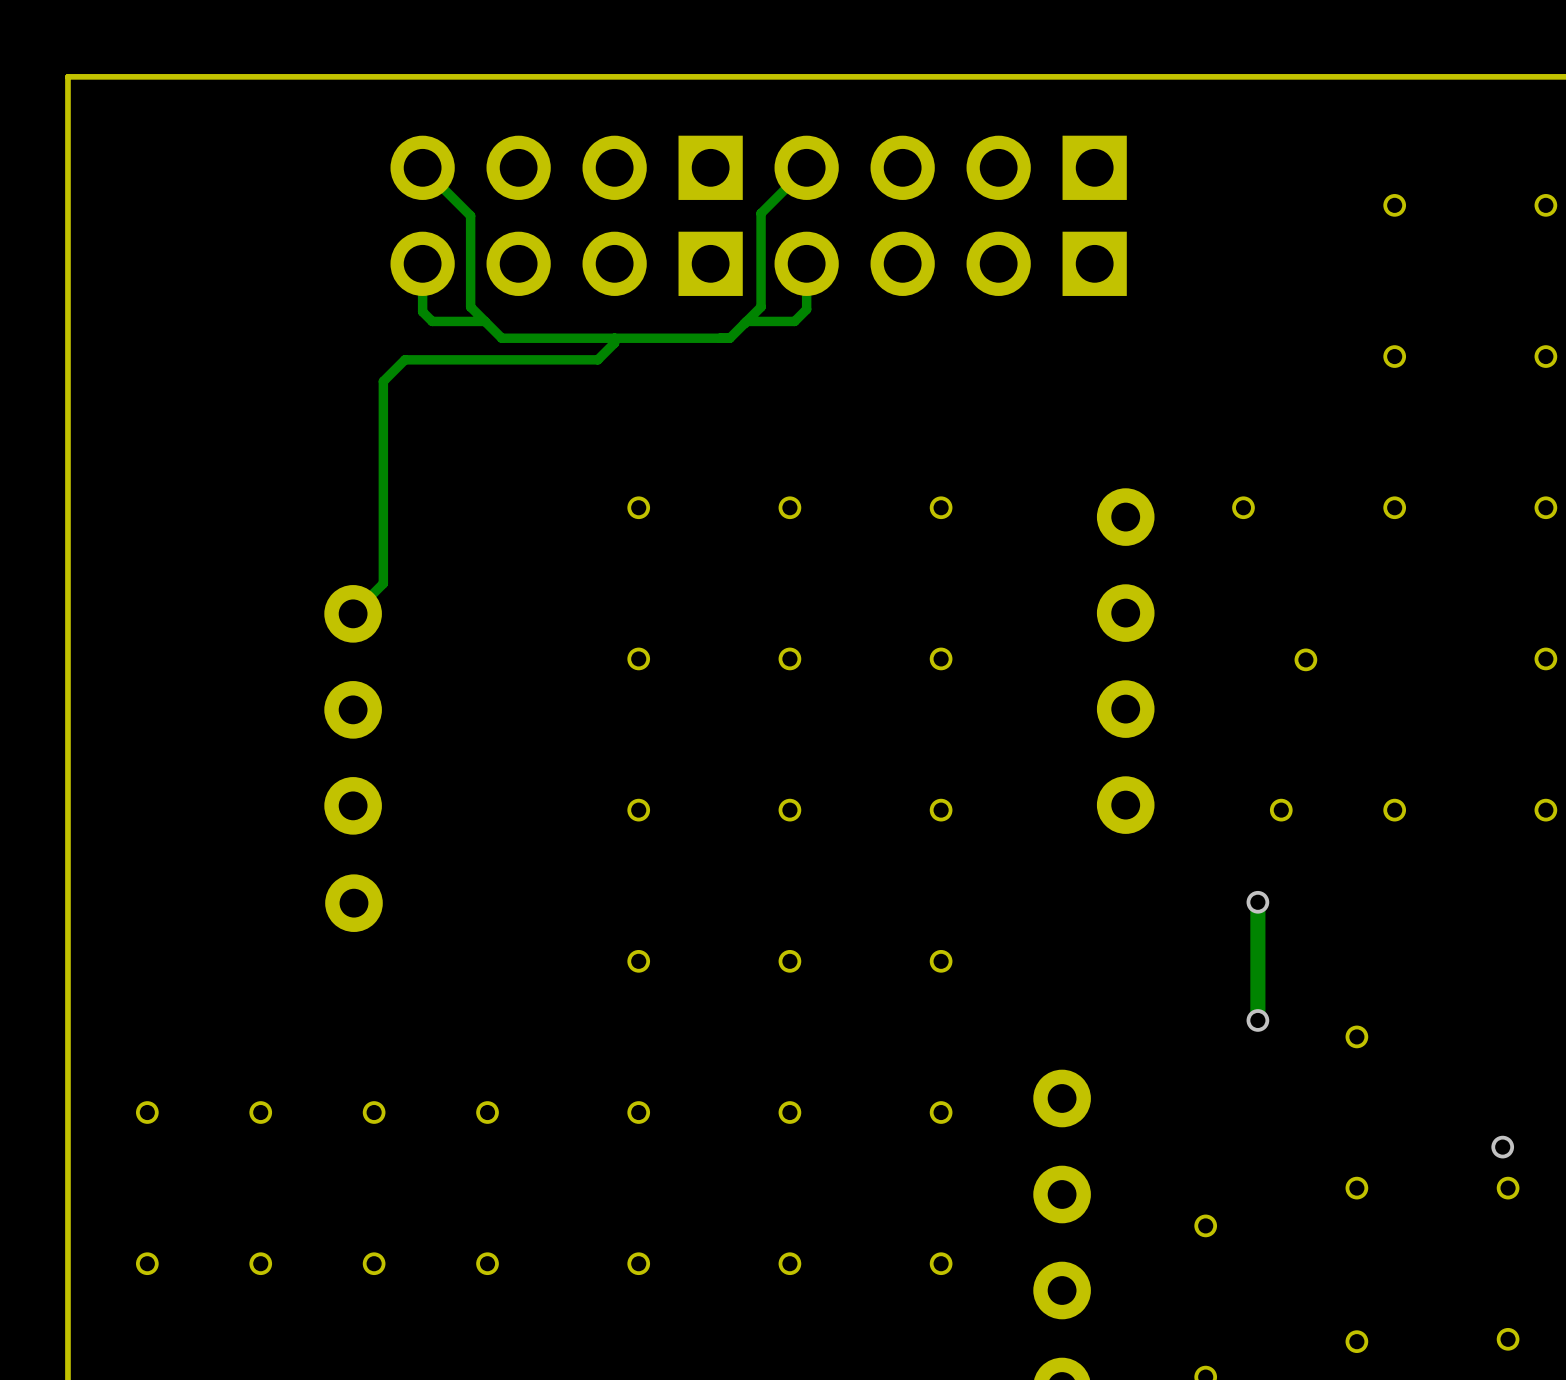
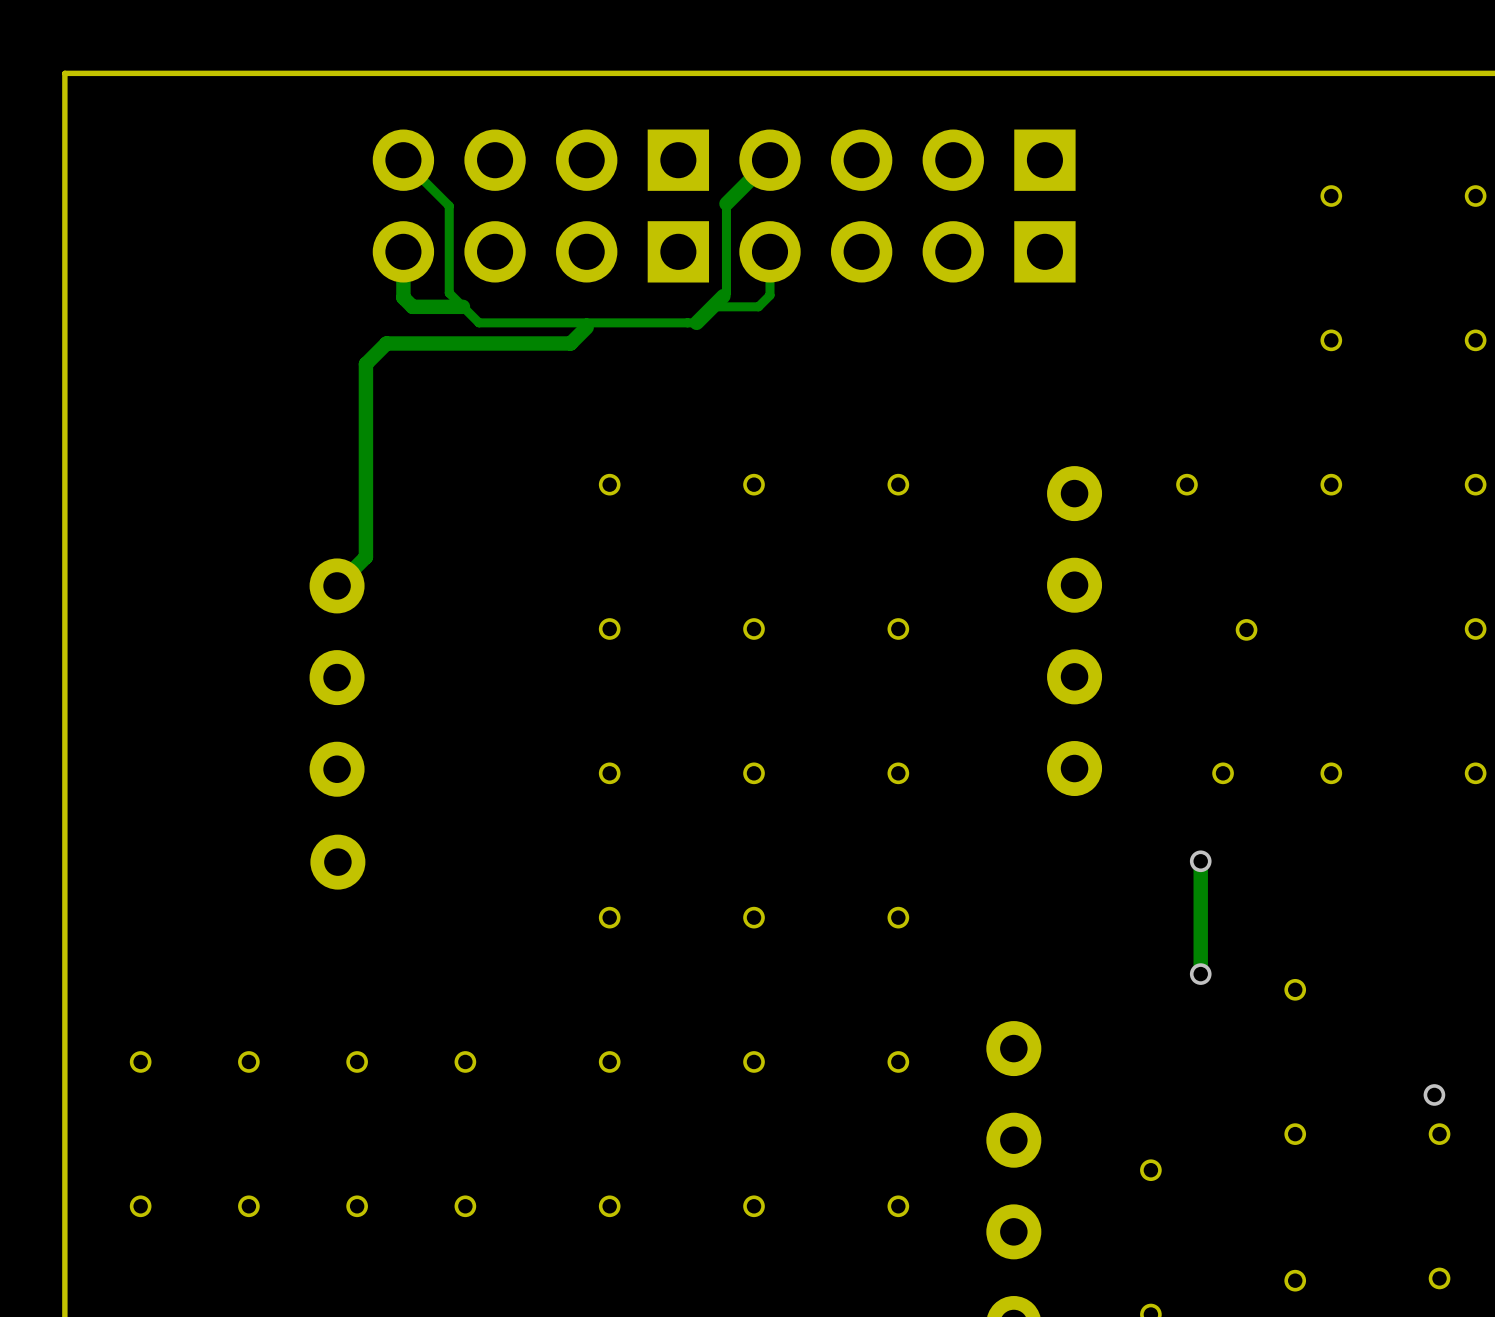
track width: thin (806, 167) (761, 213) -> thick (770, 160) (726, 203)
track width: thin (422, 263) (422, 311) (432, 321) (485, 321) -> thick (403, 251) (403, 297) (412, 306) (462, 306)
track width: thin (757, 310) (729, 338) -> thick (723, 296) (696, 322)
track width: thin (614, 343) (597, 359) (404, 359) (383, 381) (383, 583) (353, 613) -> thick (586, 327) (570, 343) (386, 343) (365, 364) (365, 557) (337, 585)

